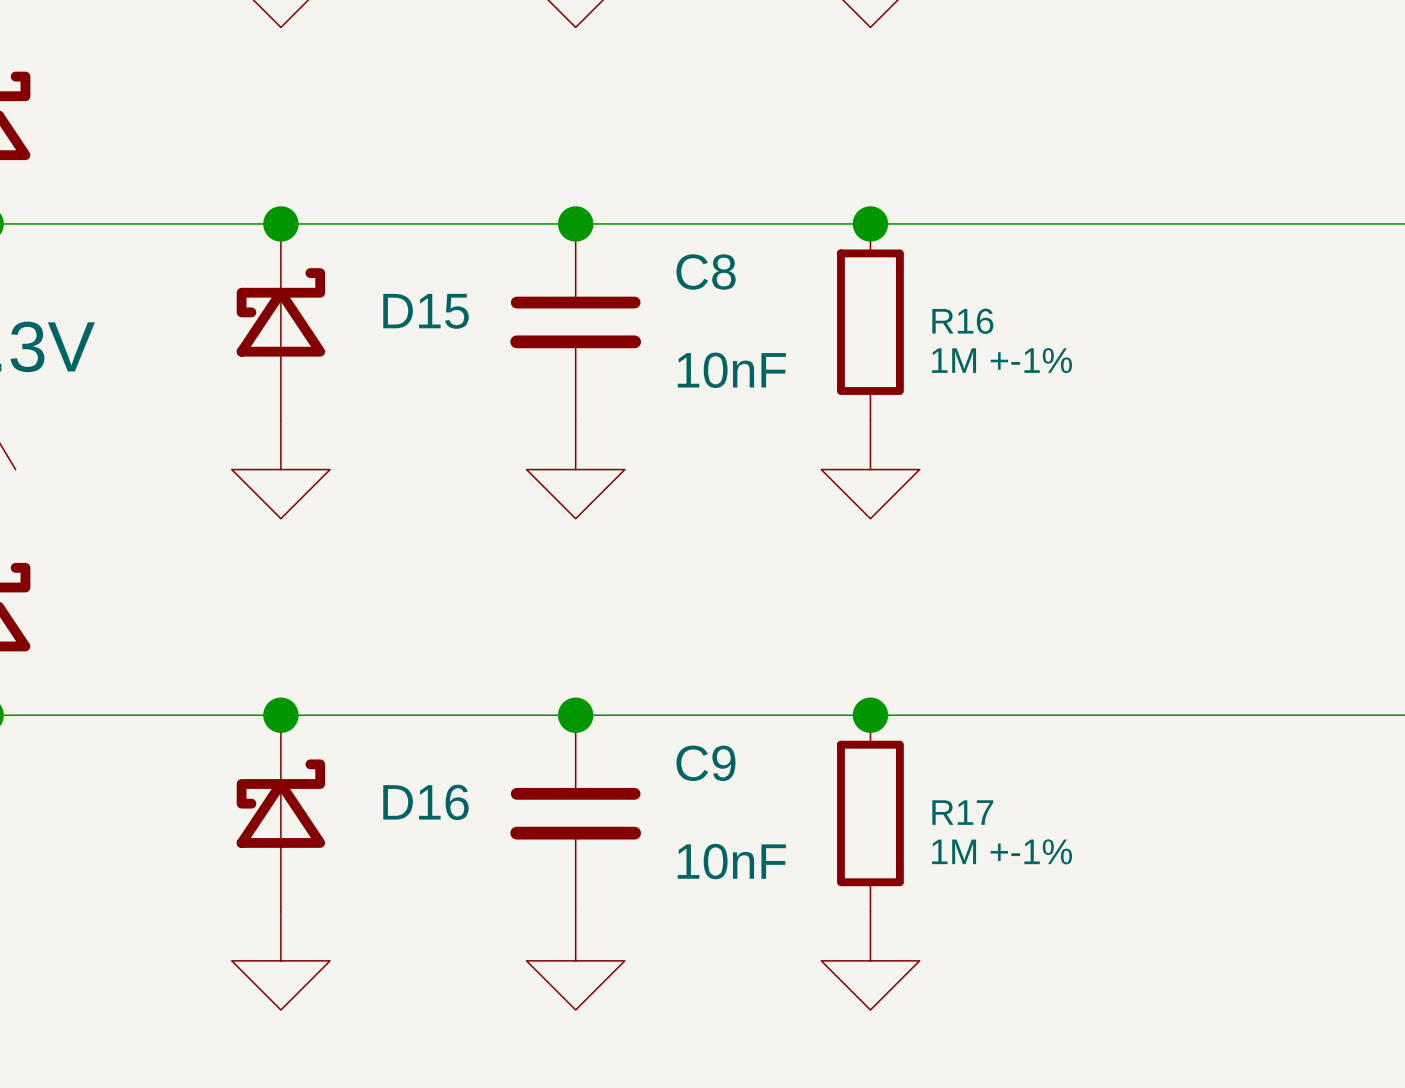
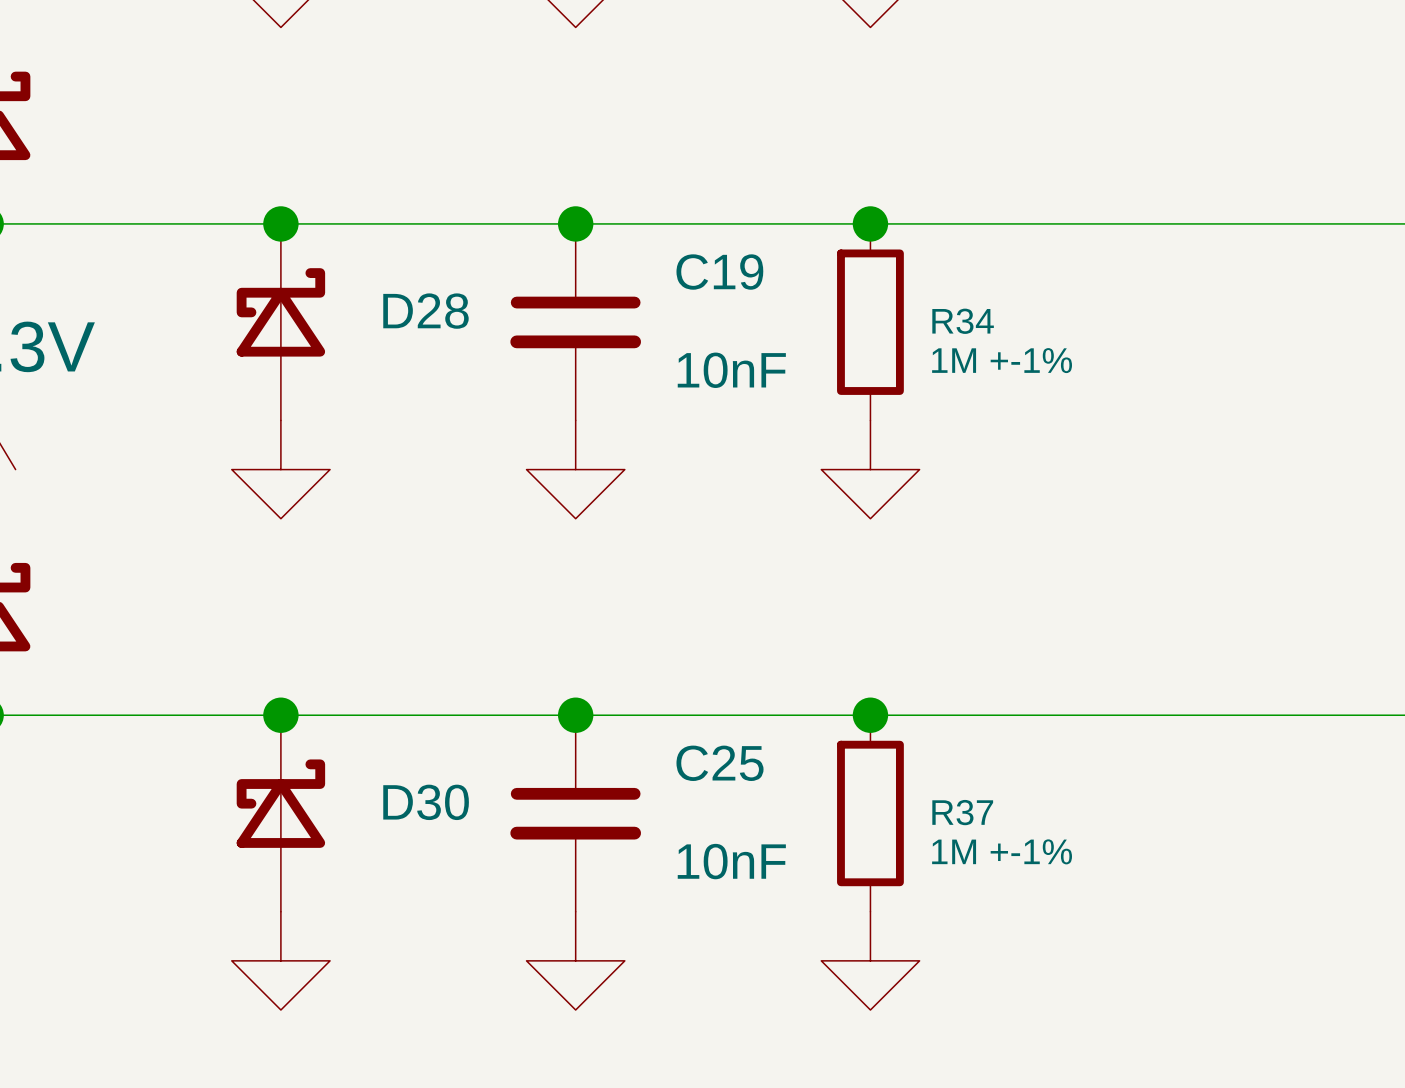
C8 name: C8 (706, 272) -> C19 (719, 272)
D15 name: D15 (426, 311) -> D28 (425, 311)
R16 name: R16 (962, 321) -> R34 (963, 321)
C9 name: C9 (705, 763) -> C25 (720, 763)
D16 name: D16 (425, 802) -> D30 (426, 802)
R17 name: R17 (962, 812) -> R37 (962, 812)

